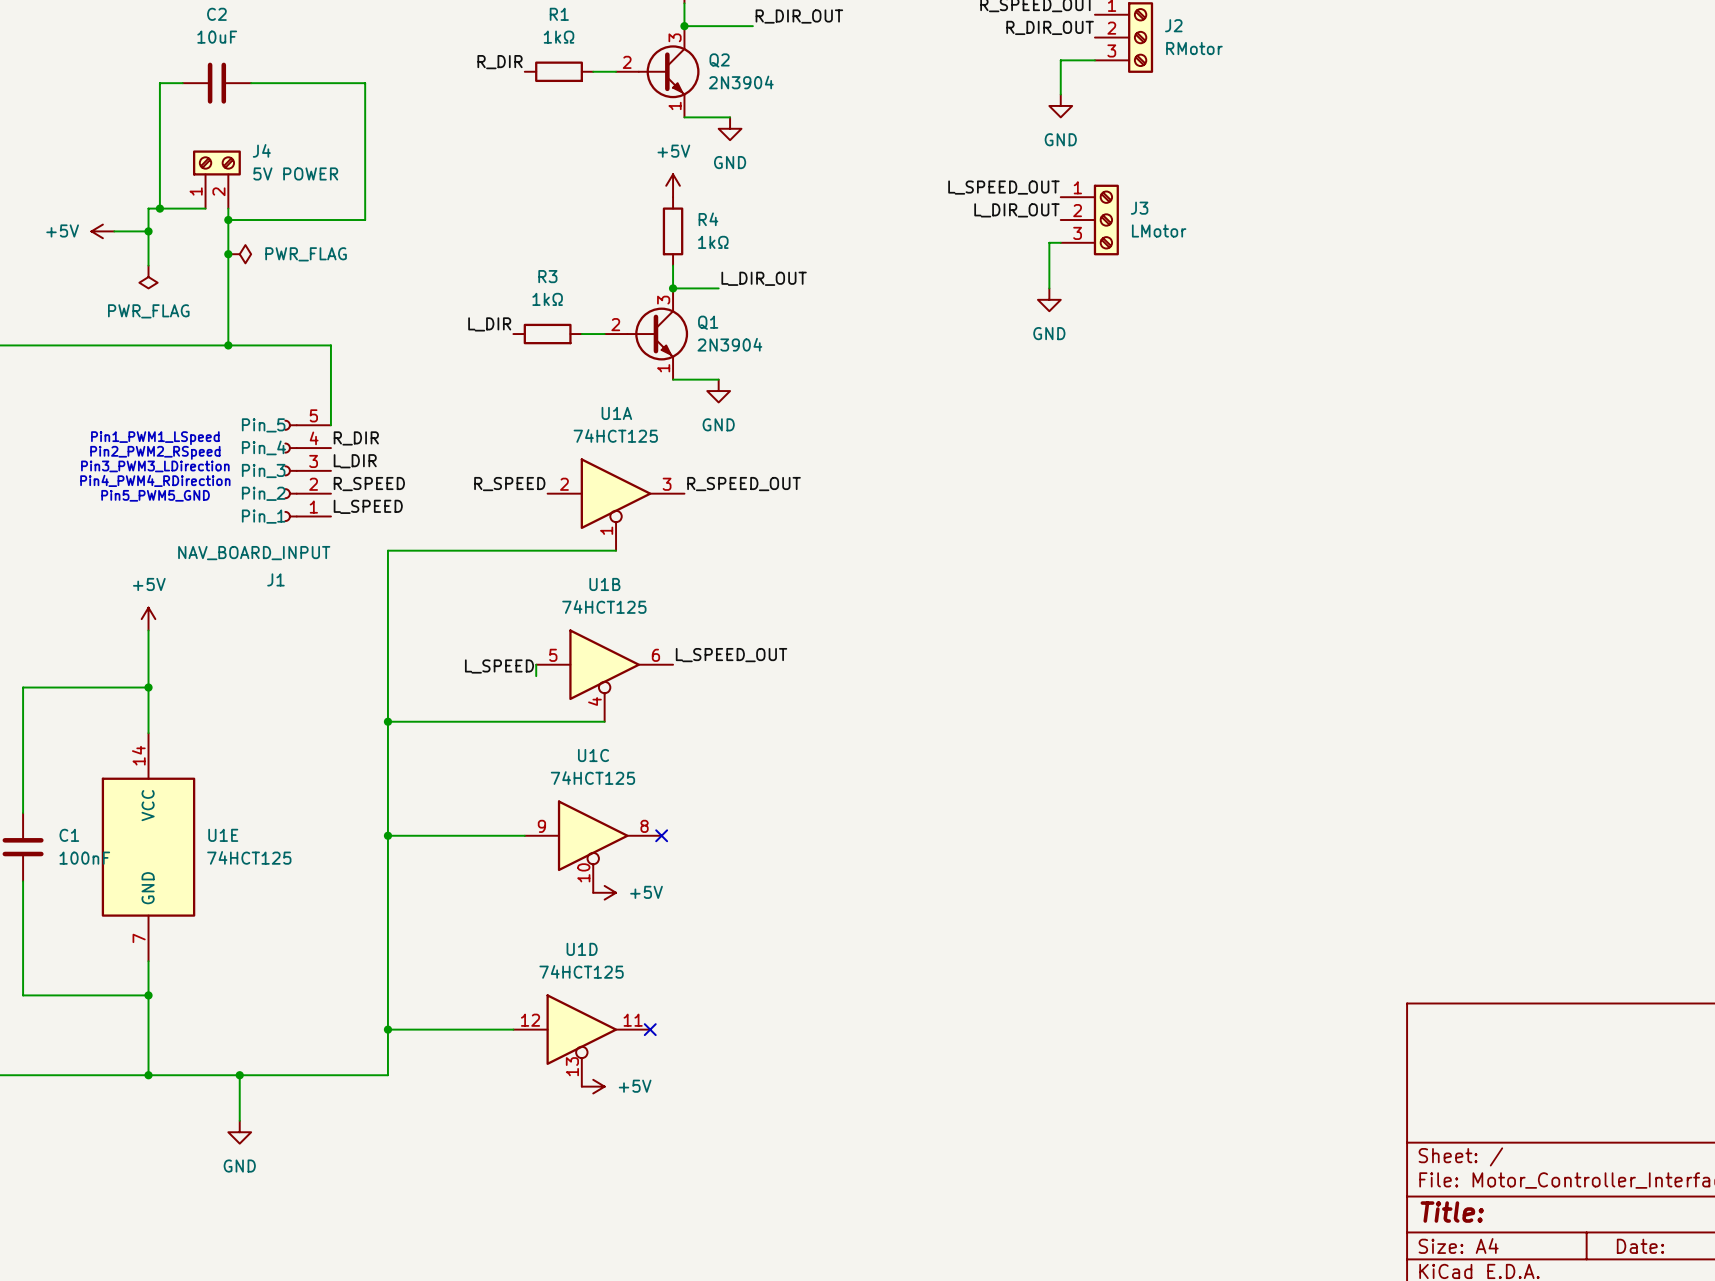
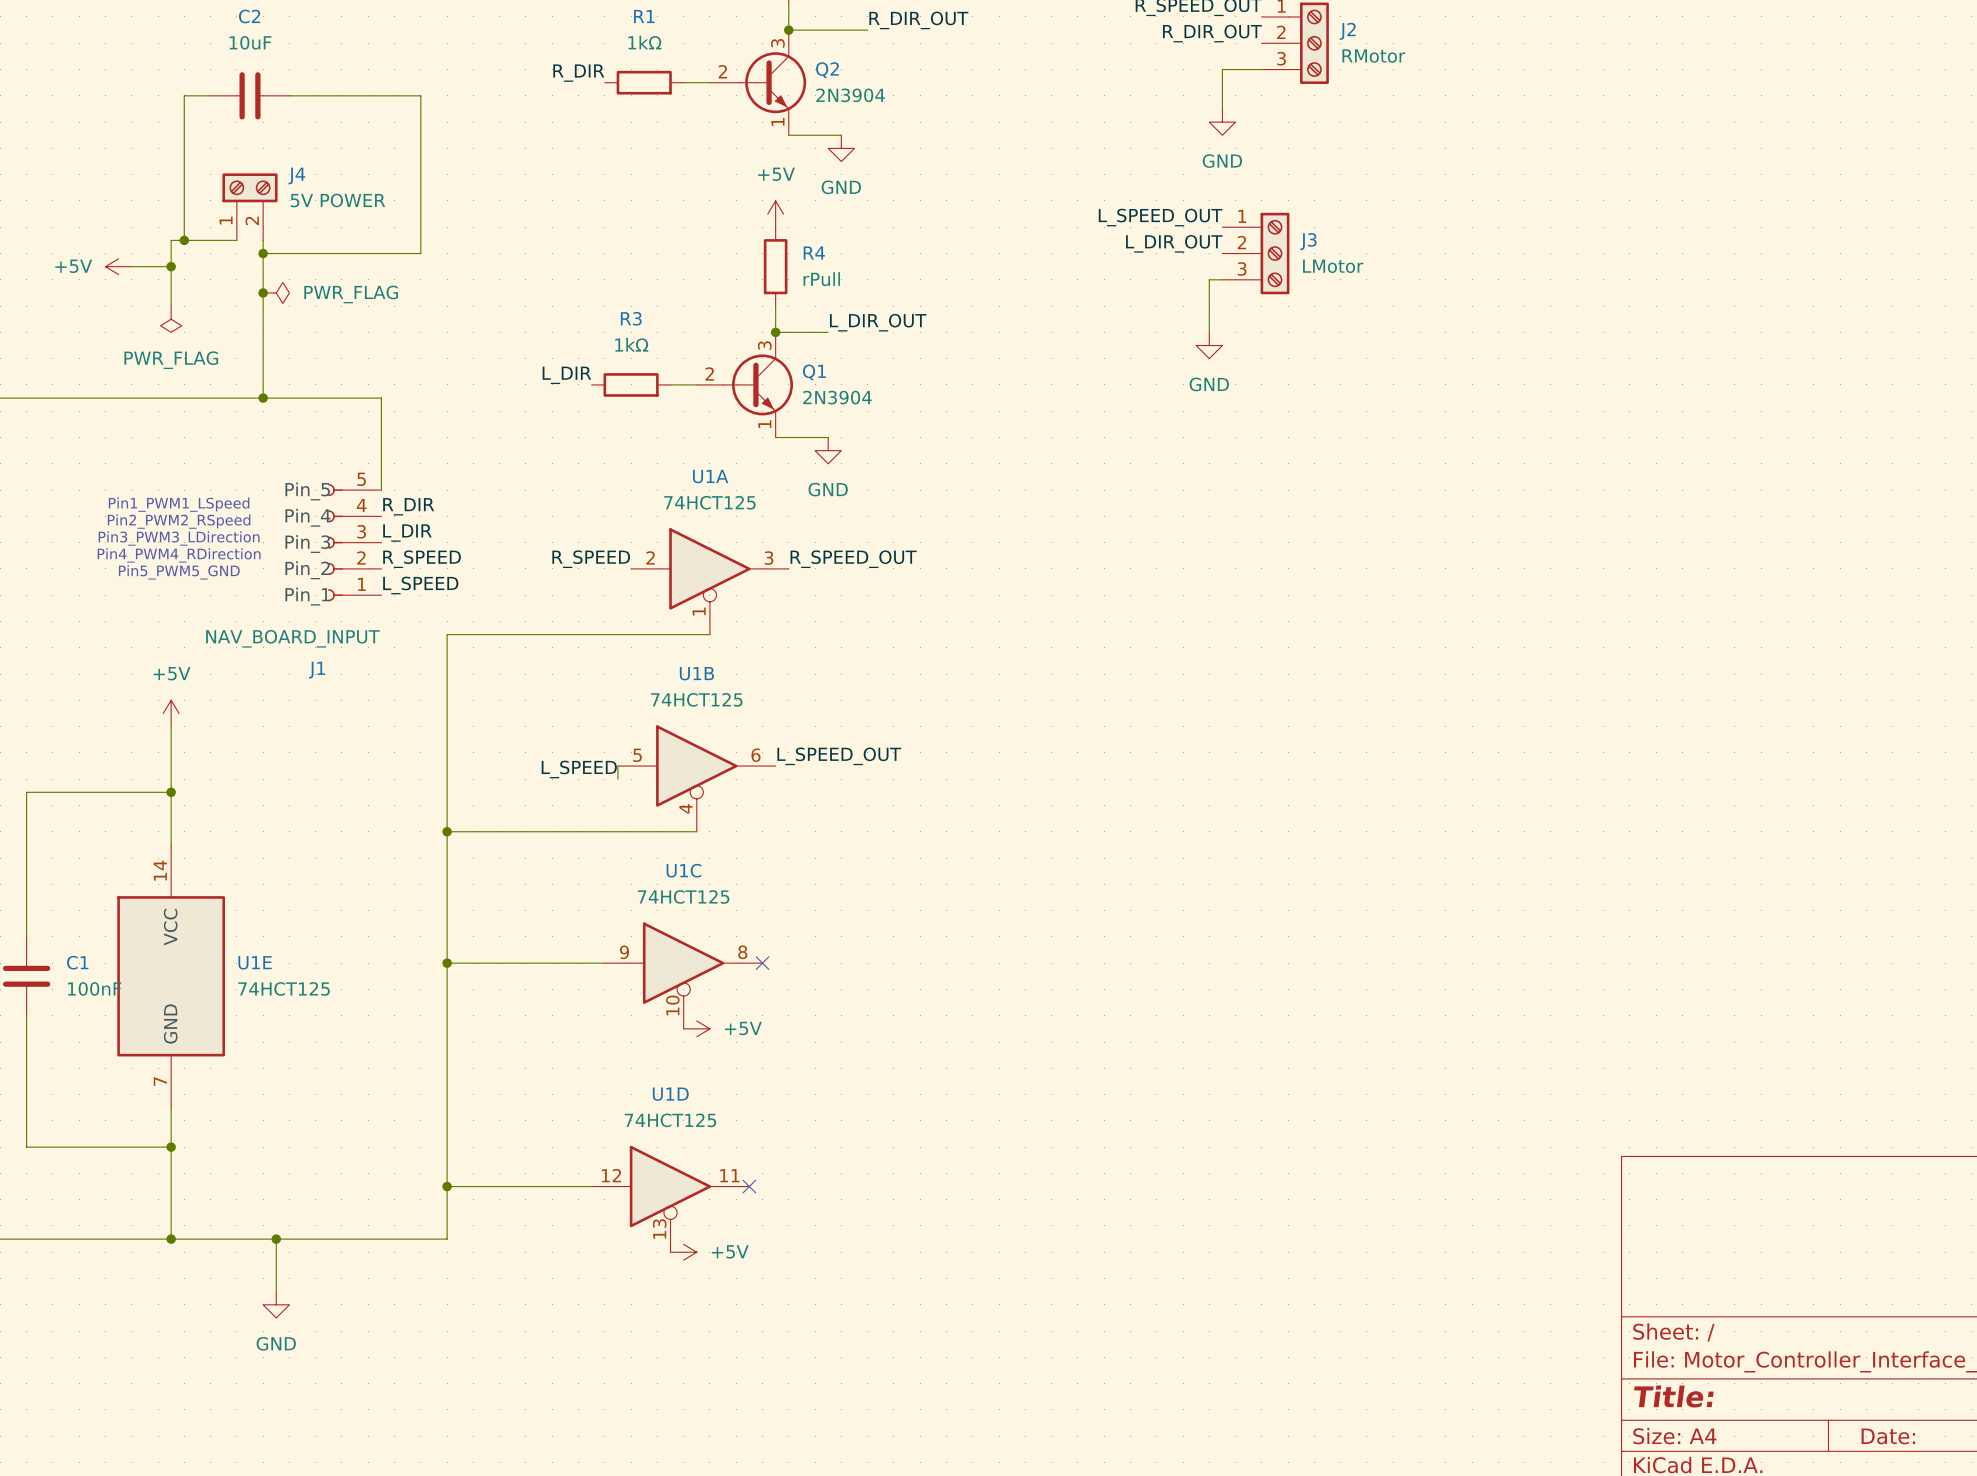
R4 value: 1kΩ (713, 242) -> rPull (821, 279)

